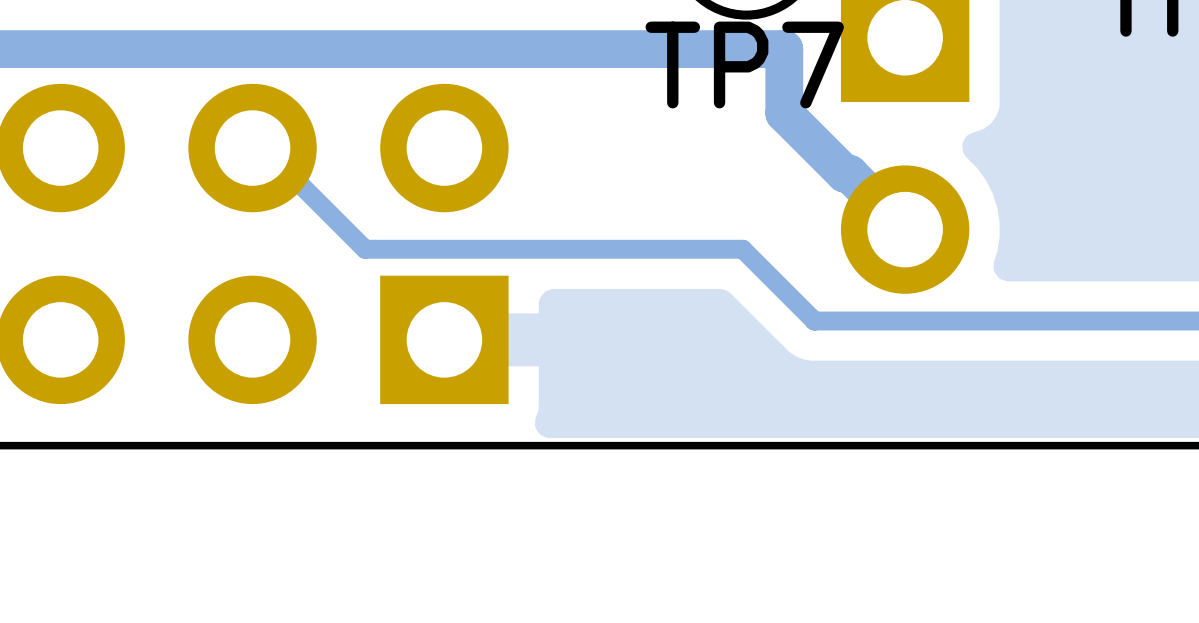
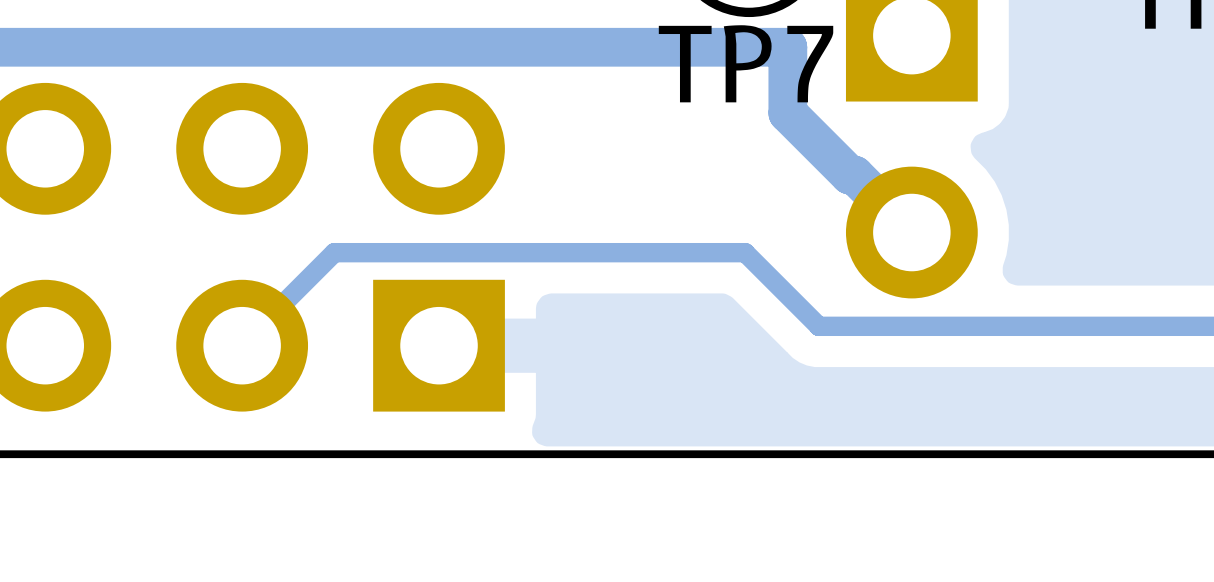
track: (289, 185) (300, 185) (365, 249) -> (280, 306) (334, 252) (357, 252)

